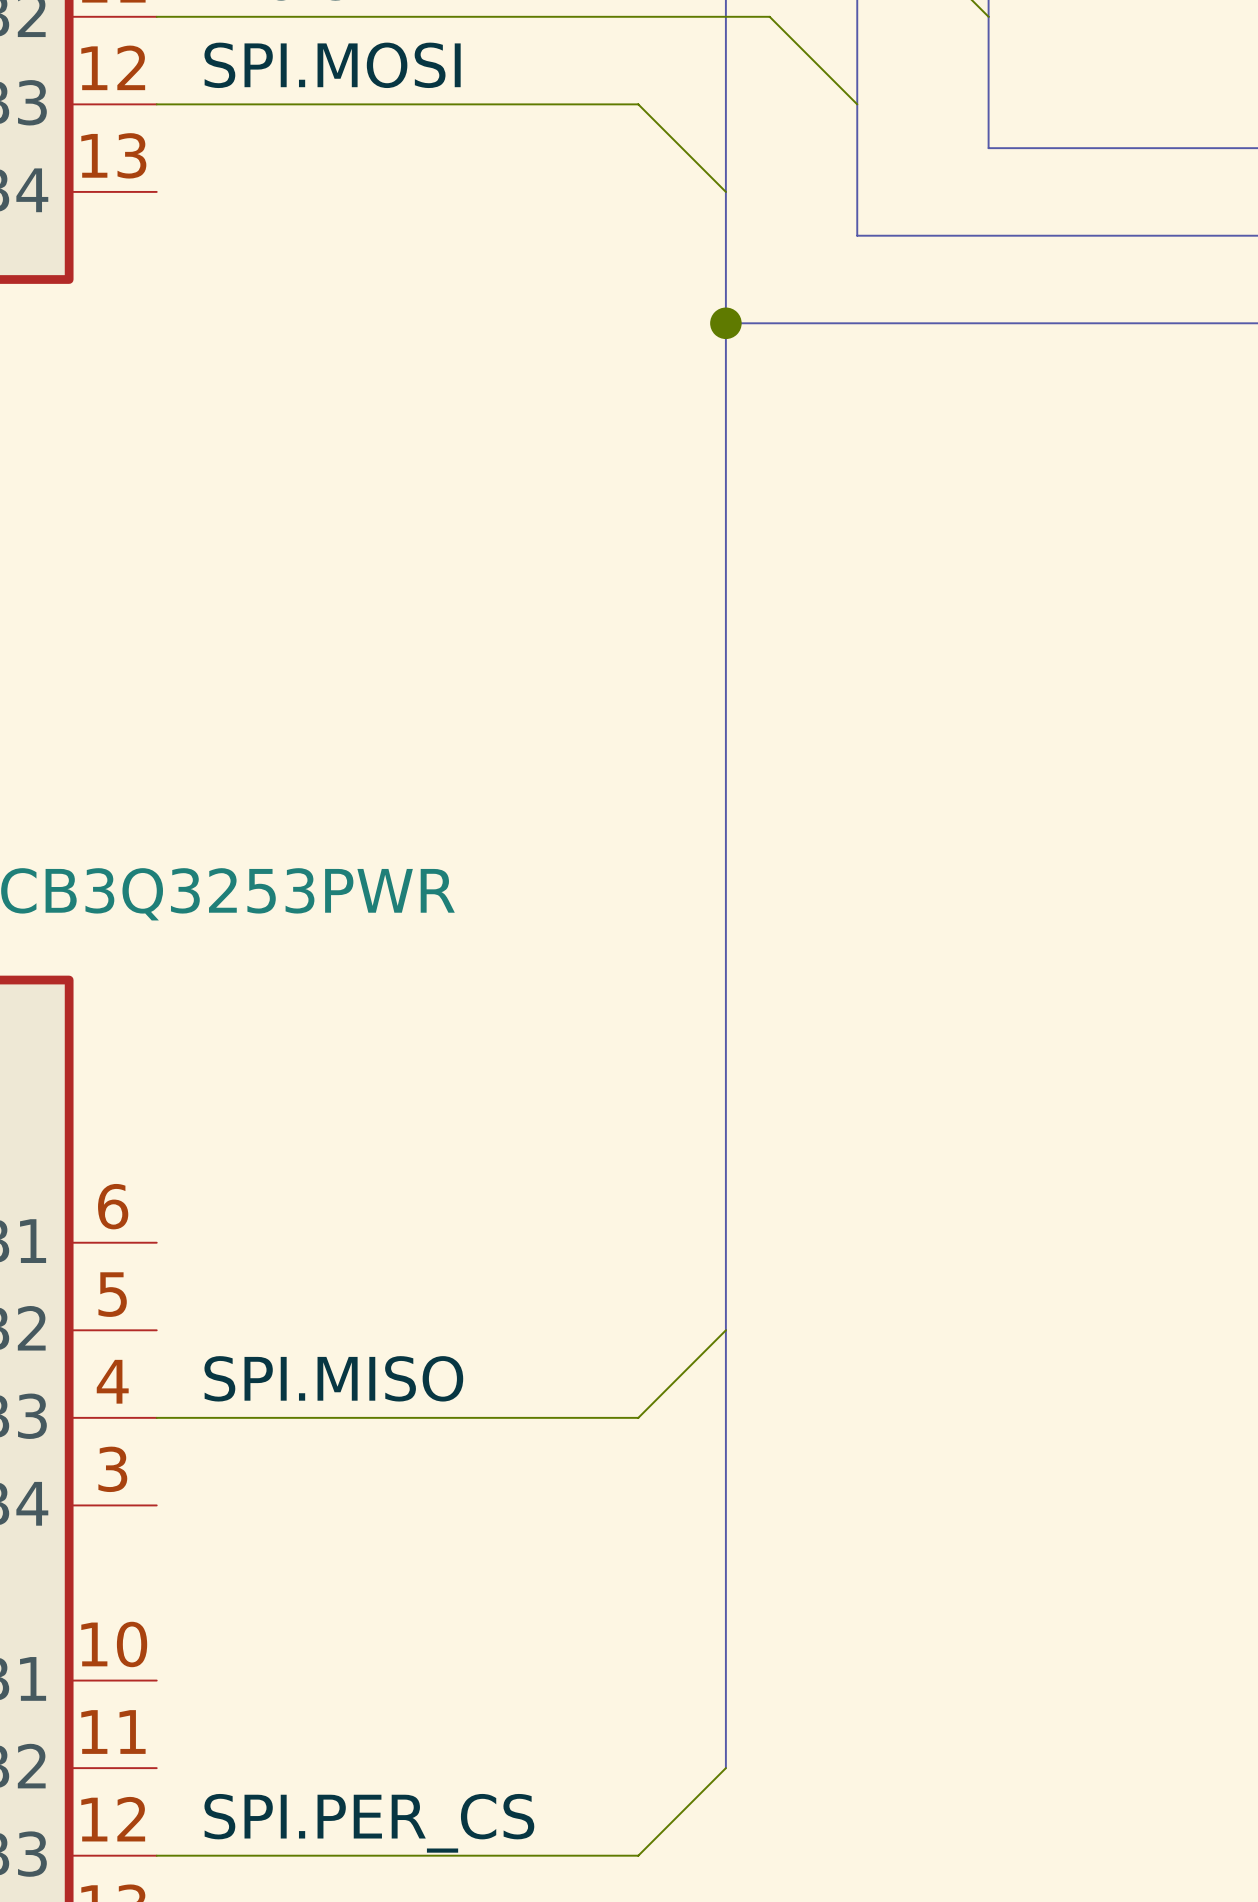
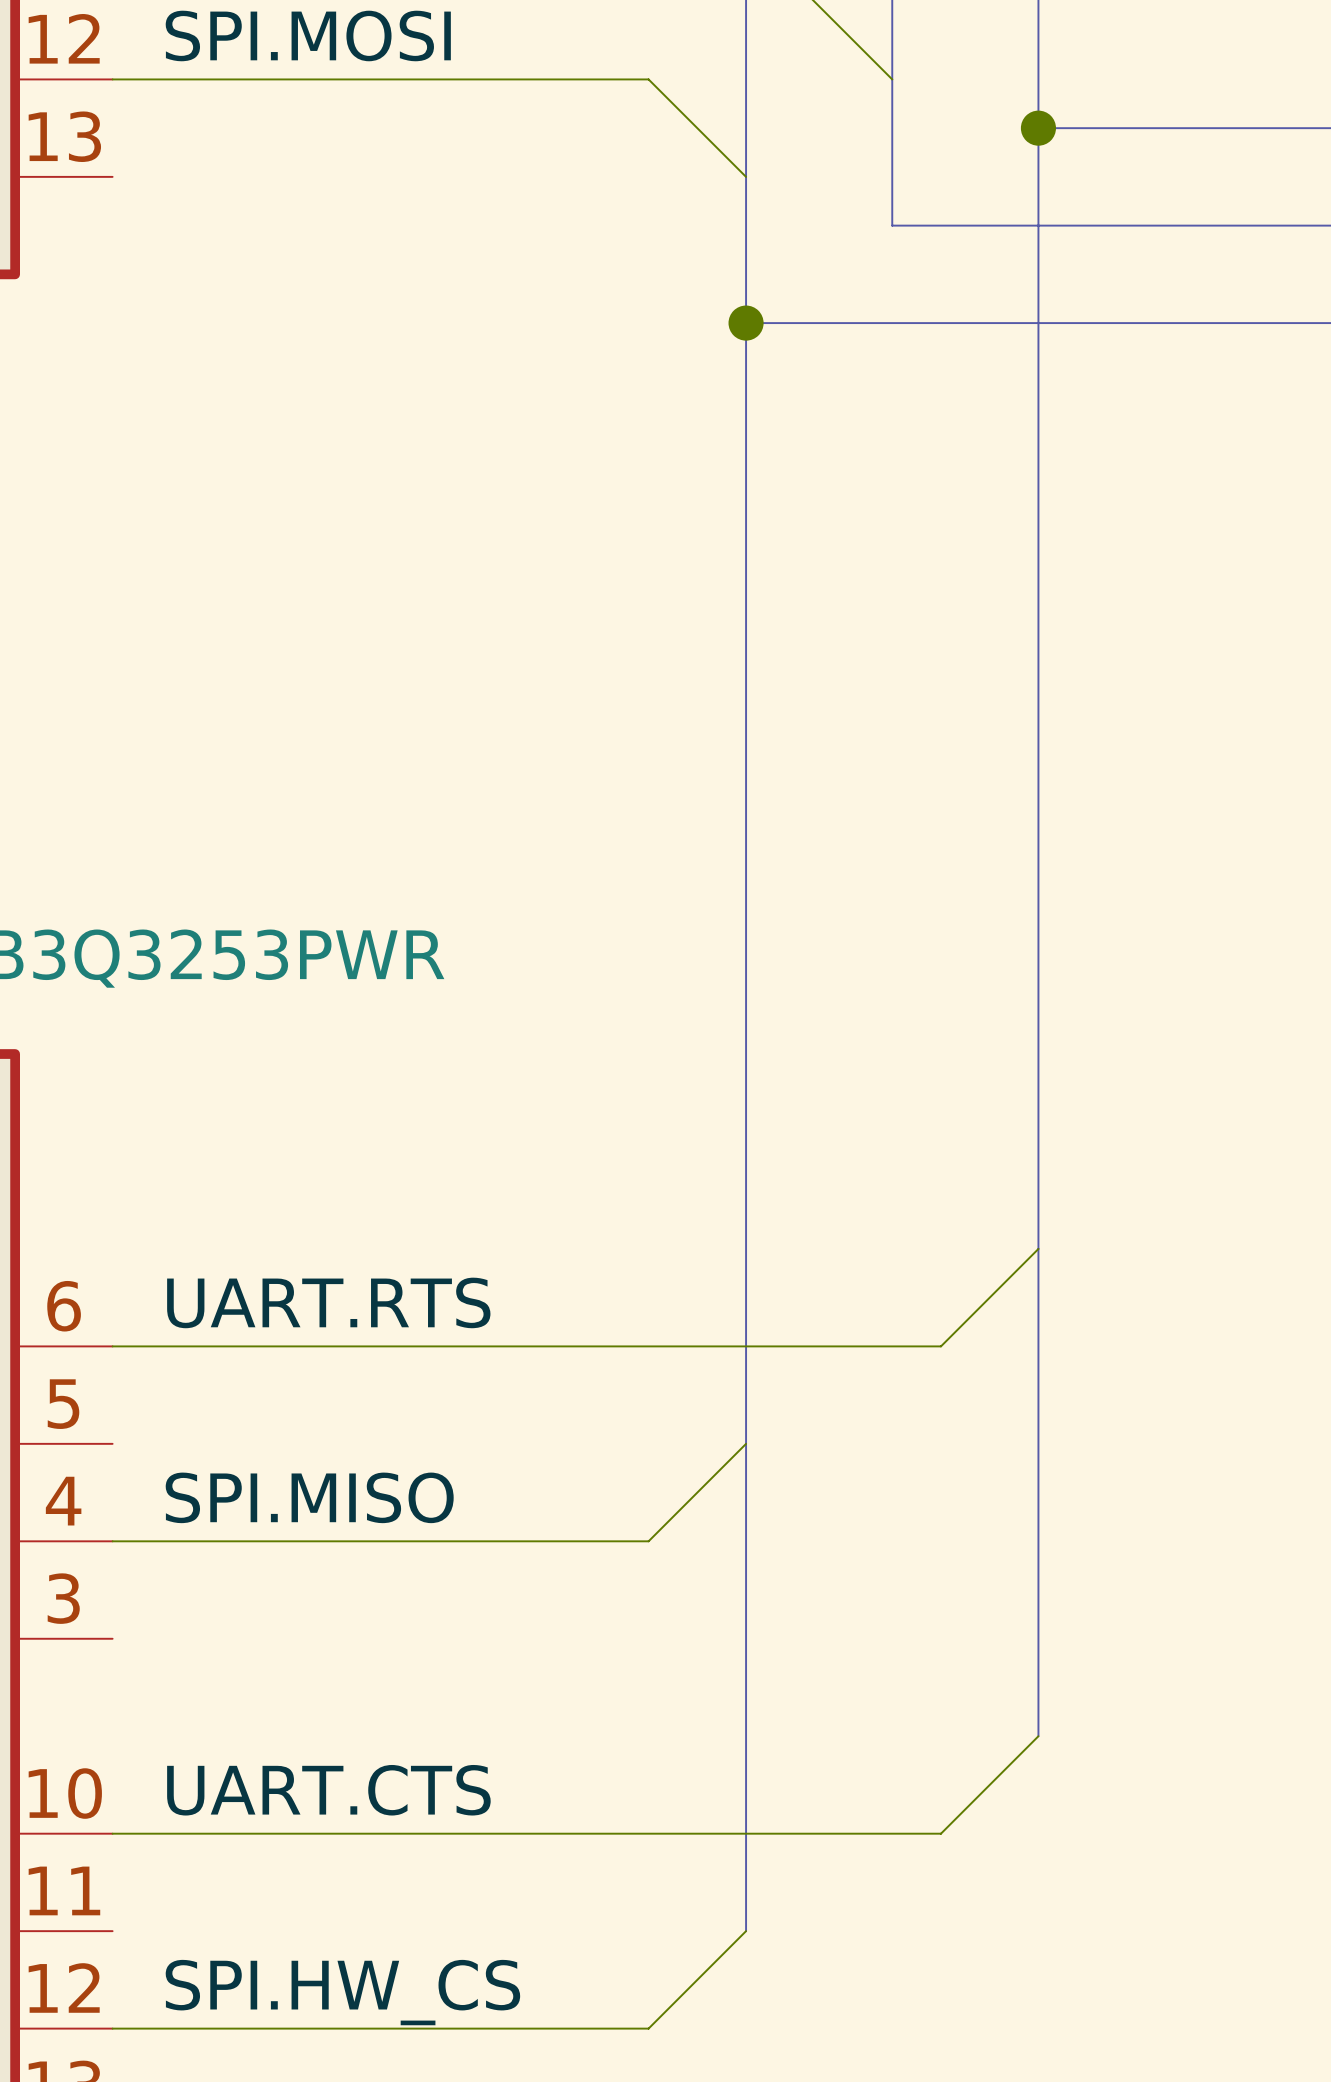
bus: none -> (1038, 128) (1038, 1736)
junction: none -> (1038, 128)
wire: none -> (1038, 1248) (940, 1346) (112, 1346)
label: none -> UART.RTS (328, 1302)
wire: none -> (1038, 1736) (940, 1833) (112, 1833)
label: none -> UART.CTS (328, 1790)
label: SPI.PER_CS (369, 1823) -> SPI.HW_CS (342, 1992)

